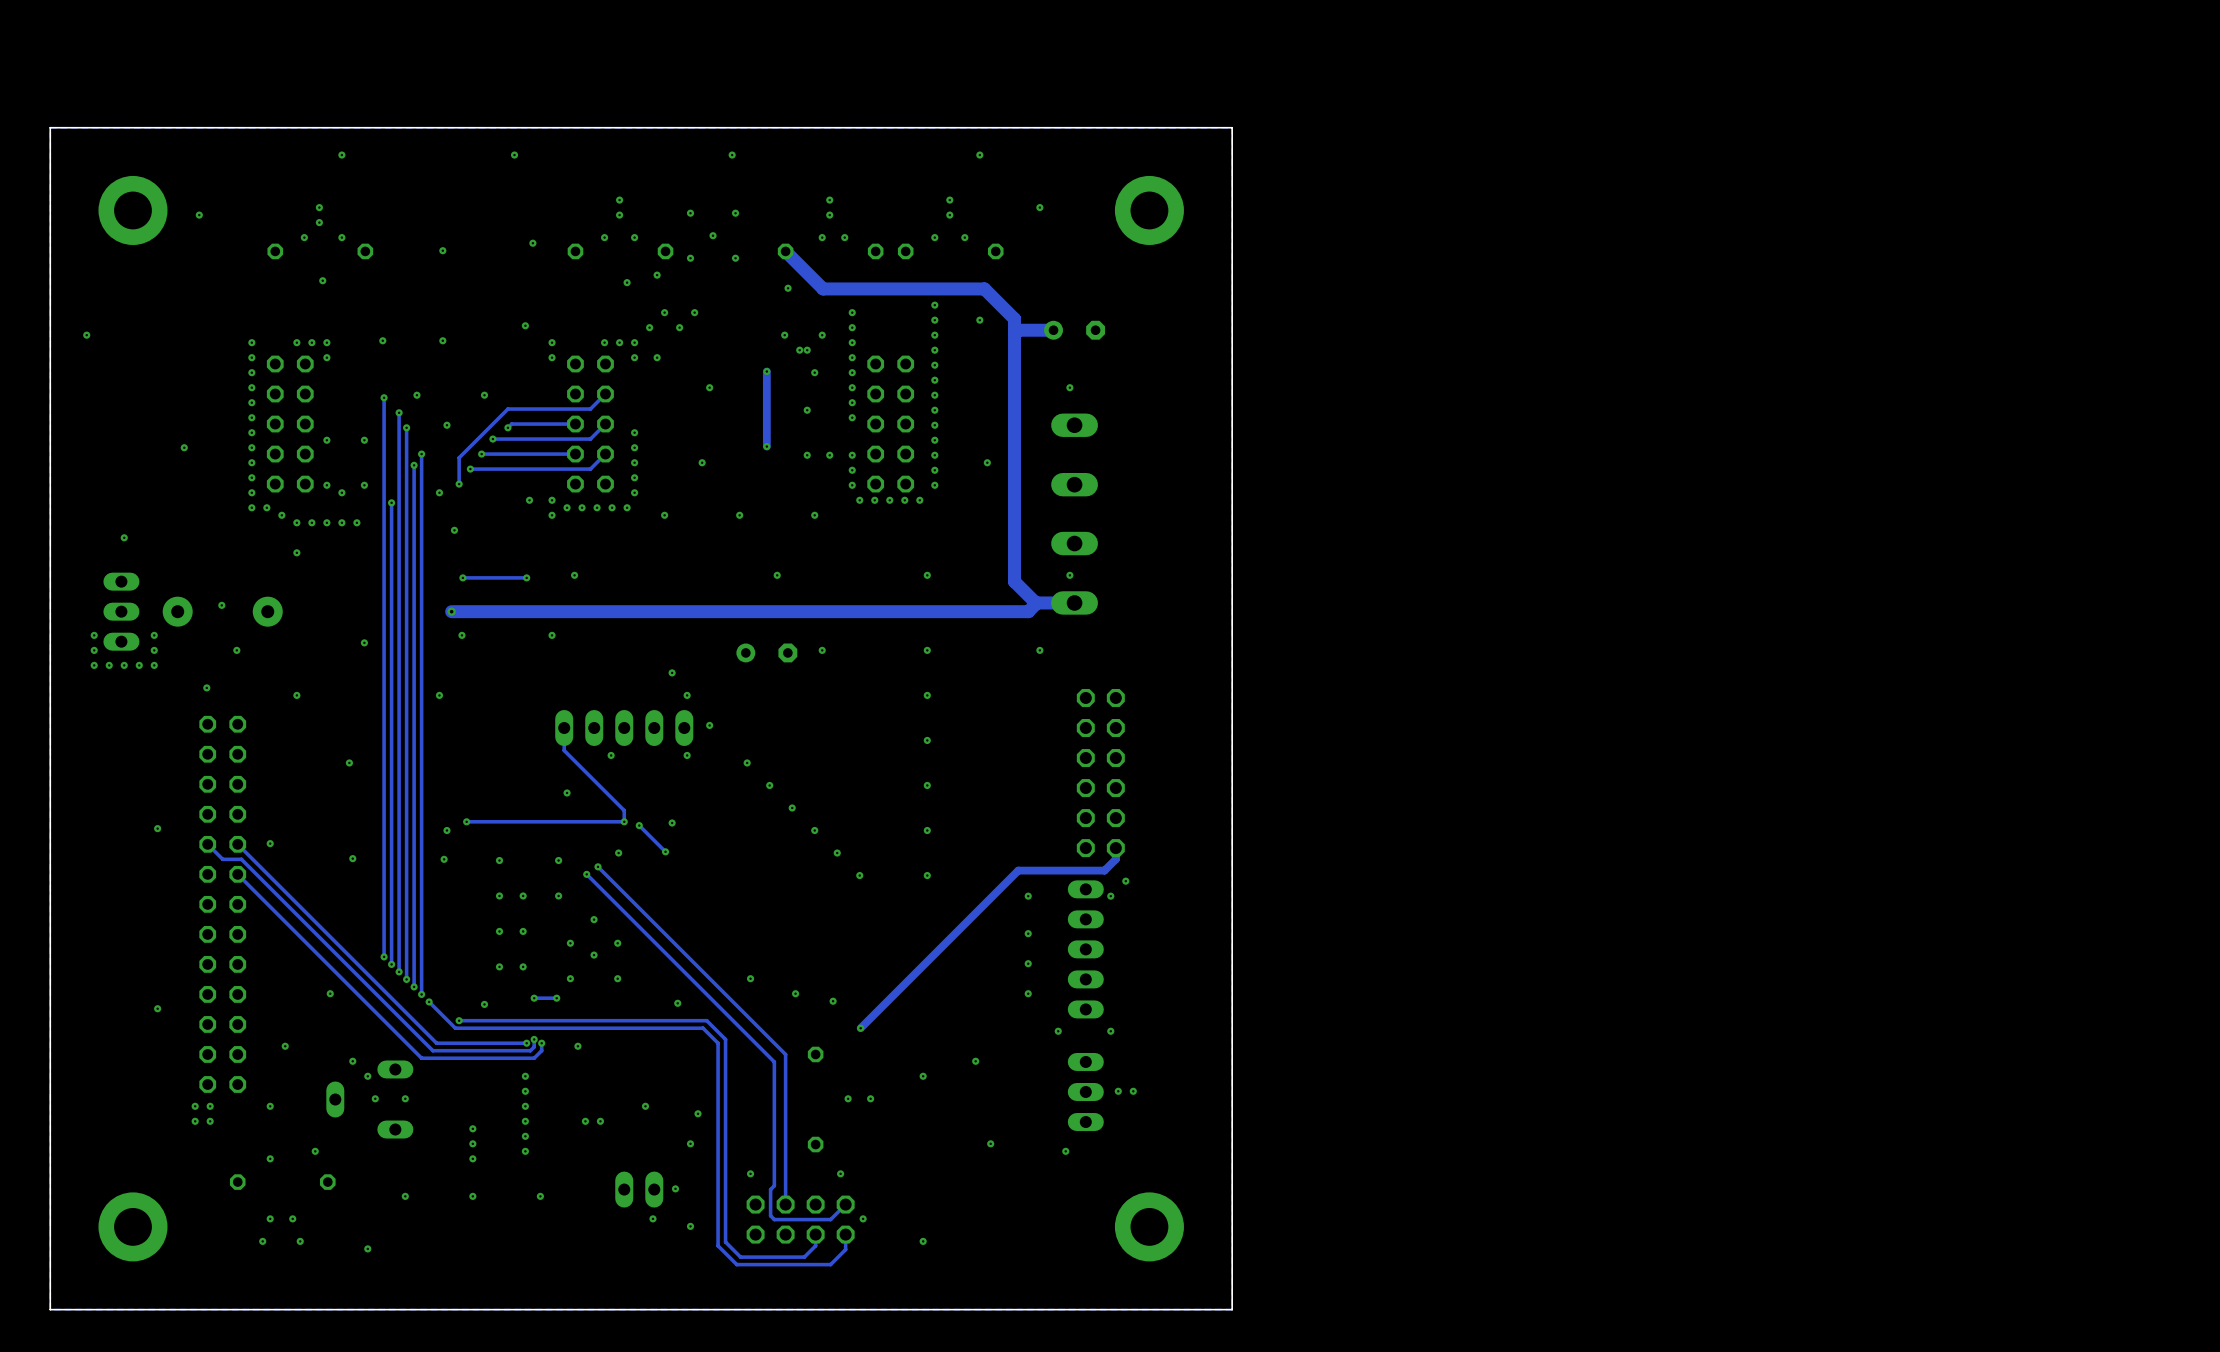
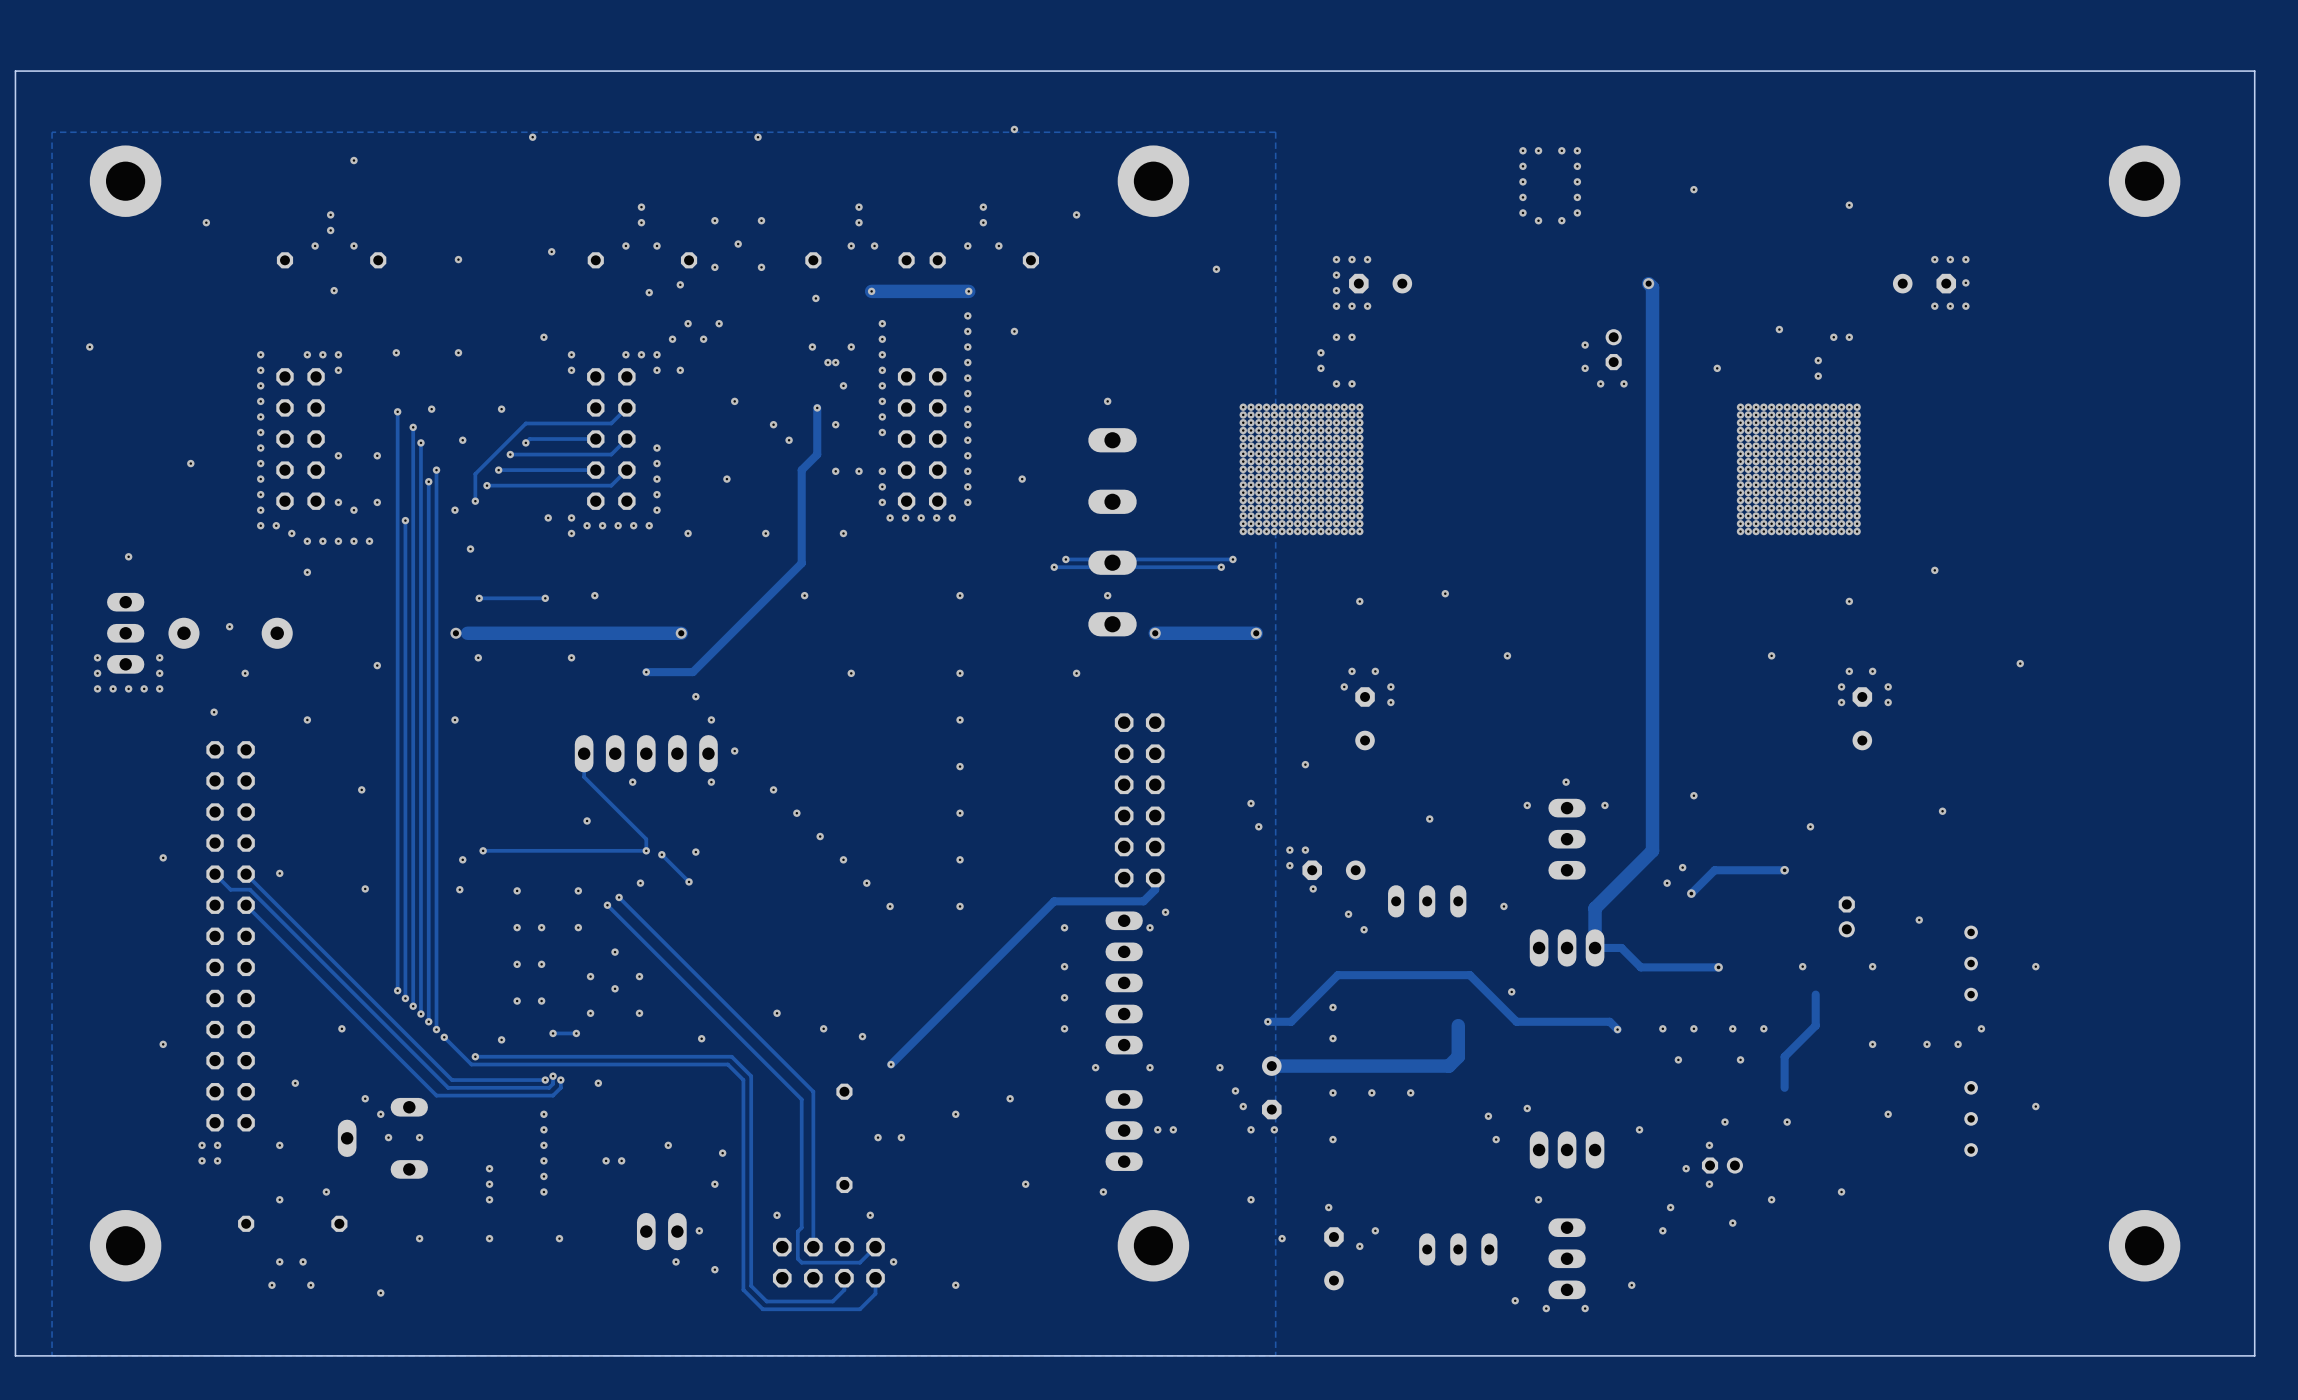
via: none -> (1522, 150)
via: none -> (1538, 150)
via: none -> (1561, 150)
via: none -> (1577, 150)
via position: (514, 155) -> (532, 137)
via position: (732, 155) -> (758, 137)
via position: (979, 155) -> (1014, 129)
via: none -> (1522, 166)
via: none -> (1577, 166)
via: none -> (1522, 181)
via: none -> (1577, 181)
part: none -> (2144, 181)
via: none -> (1693, 189)
via: none -> (1522, 197)
via: none -> (1577, 197)
via: none -> (1849, 205)
via: none -> (1522, 212)
via: none -> (1577, 212)
part position: (132, 210) -> (125, 181)
part position: (1149, 210) -> (1153, 181)
via: none -> (1538, 220)
via: none -> (1561, 220)
via: none -> (1336, 259)
via: none -> (1352, 259)
via: none -> (1367, 259)
via: none -> (1934, 259)
via: none -> (1950, 259)
via: none -> (1965, 259)
track: (785, 251) (823, 288) (984, 288) (1014, 318) (1014, 581) (1035, 602) (1074, 602) -> none
via: none -> (1216, 269)
via: none -> (1336, 275)
part: none -> (1380, 283)
track: none -> (1648, 283) (1652, 287) (1652, 850) (1595, 908) (1595, 947) (1621, 947) (1640, 967) (1718, 967)
via: none -> (1648, 283)
part: none -> (1924, 283)
via: none -> (1965, 282)
via: none -> (1336, 290)
via: none -> (871, 291)
track: none -> (968, 291) (871, 291)
via: none -> (968, 291)
via: none -> (1336, 306)
via: none -> (1352, 306)
via: none -> (1367, 306)
via: none -> (1934, 306)
via: none -> (1950, 306)
via: none -> (1965, 306)
via: none -> (1779, 329)
via: none -> (1336, 337)
via: none -> (1352, 337)
via: none -> (1833, 337)
via: none -> (1849, 337)
track: (1053, 330) (1018, 330) (1014, 333) -> none
part: (1074, 330) -> none
via: none -> (1585, 345)
part: none -> (1613, 349)
via: none -> (1320, 352)
via: none -> (1818, 360)
via: none -> (1320, 368)
via: none -> (1585, 368)
via: none -> (1717, 368)
via: none -> (1818, 376)
via: none -> (1336, 383)
via: none -> (1352, 383)
via: none -> (1600, 383)
via: none -> (1623, 383)
track: (766, 371) (766, 446) -> none
via: (766, 371) -> none
via: none -> (1243, 407)
via: none -> (1251, 407)
via: none -> (1258, 407)
via: none -> (1266, 407)
via: none -> (1274, 407)
via: none -> (1282, 407)
via: none -> (1289, 407)
via: none -> (1297, 407)
via: none -> (1305, 407)
via: none -> (1313, 407)
via: none -> (1320, 407)
via: none -> (1328, 407)
via: none -> (1336, 407)
via: none -> (1344, 407)
via: none -> (1352, 407)
via: none -> (1359, 407)
via: none -> (1740, 407)
via: none -> (1748, 407)
via: none -> (1756, 407)
via: none -> (1763, 407)
via: none -> (1771, 407)
via: none -> (1779, 407)
via: none -> (1787, 407)
via: none -> (1794, 407)
via: none -> (1802, 407)
via: none -> (1810, 407)
via: none -> (1818, 407)
via: none -> (1826, 407)
via: none -> (1833, 407)
via: none -> (1841, 407)
via: none -> (1849, 407)
via: none -> (1857, 407)
track: none -> (817, 407) (817, 454) (801, 470) (801, 563) (692, 672) (646, 672)
via: none -> (817, 407)
via: none -> (1243, 414)
via: none -> (1251, 414)
via: none -> (1258, 414)
via: none -> (1266, 414)
via: none -> (1274, 414)
via: none -> (1282, 414)
via: none -> (1289, 414)
via: none -> (1297, 414)
via: none -> (1305, 414)
via: none -> (1313, 414)
via: none -> (1320, 414)
via: none -> (1328, 414)
via: none -> (1336, 414)
via: none -> (1344, 414)
via: none -> (1352, 414)
via: none -> (1359, 414)
via: none -> (1740, 414)
via: none -> (1748, 414)
via: none -> (1756, 414)
via: none -> (1763, 414)
via: none -> (1771, 414)
via: none -> (1779, 414)
via: none -> (1787, 414)
via: none -> (1794, 414)
via: none -> (1802, 414)
via: none -> (1810, 414)
via: none -> (1818, 414)
via: none -> (1826, 414)
via: none -> (1833, 414)
via: none -> (1841, 414)
via: none -> (1849, 414)
via: none -> (1857, 414)
via: none -> (1243, 422)
via: none -> (1251, 422)
via: none -> (1258, 422)
via: none -> (1266, 422)
via: none -> (1274, 422)
via: none -> (1282, 422)
via: none -> (1289, 422)
via: none -> (1297, 422)
via: none -> (1305, 422)
via: none -> (1313, 422)
via: none -> (1320, 422)
via: none -> (1328, 422)
via: none -> (1336, 422)
via: none -> (1344, 422)
via: none -> (1352, 422)
via: none -> (1359, 422)
via: none -> (1740, 422)
via: none -> (1748, 422)
via: none -> (1756, 422)
via: none -> (1763, 422)
via: none -> (1771, 422)
via: none -> (1779, 422)
via: none -> (1787, 422)
via: none -> (1794, 422)
via: none -> (1802, 422)
via: none -> (1810, 422)
via: none -> (1818, 422)
via: none -> (1826, 422)
via: none -> (1833, 422)
via: none -> (1841, 422)
via: none -> (1849, 422)
via: none -> (1857, 422)
via: none -> (773, 424)
via: none -> (1243, 430)
via: none -> (1251, 430)
via: none -> (1258, 430)
via: none -> (1266, 430)
via: none -> (1274, 430)
via: none -> (1282, 430)
via: none -> (1289, 430)
via: none -> (1297, 430)
via: none -> (1305, 430)
via: none -> (1313, 430)
via: none -> (1320, 430)
via: none -> (1328, 430)
via: none -> (1336, 430)
via: none -> (1344, 430)
via: none -> (1352, 430)
via: none -> (1359, 430)
via: none -> (1740, 430)
via: none -> (1748, 430)
via: none -> (1756, 430)
via: none -> (1763, 430)
via: none -> (1771, 430)
via: none -> (1779, 430)
via: none -> (1787, 430)
via: none -> (1794, 430)
via: none -> (1802, 430)
via: none -> (1810, 430)
via: none -> (1818, 430)
via: none -> (1826, 430)
via: none -> (1833, 430)
via: none -> (1841, 430)
via: none -> (1849, 430)
via: none -> (1857, 430)
via: none -> (1243, 438)
via: none -> (1251, 438)
via: none -> (1258, 438)
via: none -> (1266, 438)
via: none -> (1274, 438)
via: none -> (1282, 438)
via: none -> (1289, 438)
via: none -> (1297, 438)
via: none -> (1305, 438)
via: none -> (1313, 438)
via: none -> (1320, 438)
via: none -> (1328, 438)
via: none -> (1336, 438)
via: none -> (1344, 438)
via: none -> (1352, 438)
via: none -> (1359, 438)
via: none -> (1740, 438)
via: none -> (1748, 438)
via: none -> (1756, 438)
via: none -> (1763, 438)
via: none -> (1771, 438)
via: none -> (1779, 438)
via: none -> (1787, 438)
via: none -> (1794, 438)
via: none -> (1802, 438)
via: none -> (1810, 438)
via: none -> (1818, 438)
via: none -> (1826, 438)
via: none -> (1833, 438)
via: none -> (1841, 438)
via: none -> (1849, 438)
via: none -> (1857, 438)
via: none -> (789, 440)
via: none -> (1243, 446)
via: none -> (1251, 446)
via: none -> (1258, 446)
via: none -> (1266, 446)
via: none -> (1274, 446)
via: none -> (1282, 446)
via: none -> (1289, 446)
via: none -> (1297, 446)
via: none -> (1305, 446)
via: none -> (1313, 446)
via: none -> (1320, 446)
via: none -> (1328, 446)
via: none -> (1336, 446)
via: none -> (1344, 446)
via: none -> (1352, 446)
via: none -> (1359, 446)
via: none -> (1740, 446)
via: none -> (1748, 446)
via: none -> (1756, 446)
via: none -> (1763, 446)
via: none -> (1771, 446)
via: none -> (1779, 446)
via: none -> (1787, 446)
via: none -> (1794, 446)
via: none -> (1802, 446)
via: none -> (1810, 446)
via: none -> (1818, 446)
via: none -> (1826, 446)
via: none -> (1833, 446)
via: none -> (1841, 446)
via: none -> (1849, 446)
via: none -> (1857, 446)
via: none -> (1243, 453)
via: none -> (1251, 453)
via: none -> (1258, 453)
via: none -> (1266, 453)
via: none -> (1274, 453)
via: none -> (1282, 453)
via: none -> (1289, 453)
via: none -> (1297, 453)
via: none -> (1305, 453)
via: none -> (1313, 453)
via: none -> (1320, 453)
via: none -> (1328, 453)
via: none -> (1336, 453)
via: none -> (1344, 453)
via: none -> (1352, 453)
via: none -> (1359, 453)
via: none -> (1740, 453)
via: none -> (1748, 453)
via: none -> (1756, 453)
via: none -> (1763, 453)
via: none -> (1771, 453)
via: none -> (1779, 453)
via: none -> (1787, 453)
via: none -> (1794, 453)
via: none -> (1802, 453)
via: none -> (1810, 453)
via: none -> (1818, 453)
via: none -> (1826, 453)
via: none -> (1833, 453)
via: none -> (1841, 453)
via: none -> (1849, 453)
via: none -> (1857, 453)
via: none -> (1243, 461)
via: none -> (1251, 461)
via: none -> (1258, 461)
via: none -> (1266, 461)
via: none -> (1274, 461)
via: none -> (1282, 461)
via: none -> (1289, 461)
via: none -> (1297, 461)
via: none -> (1305, 461)
via: none -> (1313, 461)
via: none -> (1320, 461)
via: none -> (1328, 461)
via: none -> (1336, 461)
via: none -> (1344, 461)
via: none -> (1352, 461)
via: none -> (1359, 461)
via: none -> (1740, 461)
via: none -> (1748, 461)
via: none -> (1756, 461)
via: none -> (1763, 461)
via: none -> (1771, 461)
via: none -> (1779, 461)
via: none -> (1787, 461)
via: none -> (1794, 461)
via: none -> (1802, 461)
via: none -> (1810, 461)
via: none -> (1818, 461)
via: none -> (1826, 461)
via: none -> (1833, 461)
via: none -> (1841, 461)
via: none -> (1849, 461)
via: none -> (1857, 461)
via: (766, 446) -> none
via: none -> (1243, 469)
via: none -> (1251, 469)
via: none -> (1258, 469)
via: none -> (1266, 469)
via: none -> (1274, 469)
via: none -> (1282, 469)
via: none -> (1289, 469)
via: none -> (1297, 469)
via: none -> (1305, 469)
via: none -> (1313, 469)
via: none -> (1320, 469)
via: none -> (1328, 469)
via: none -> (1336, 469)
via: none -> (1344, 469)
via: none -> (1352, 469)
via: none -> (1359, 469)
via: none -> (1740, 469)
via: none -> (1748, 469)
via: none -> (1756, 469)
via: none -> (1763, 469)
via: none -> (1771, 469)
via: none -> (1779, 469)
via: none -> (1787, 469)
via: none -> (1794, 469)
via: none -> (1802, 469)
via: none -> (1810, 469)
via: none -> (1818, 469)
via: none -> (1826, 469)
via: none -> (1833, 469)
via: none -> (1841, 469)
via: none -> (1849, 469)
via: none -> (1857, 469)
via: none -> (1243, 477)
via: none -> (1251, 477)
via: none -> (1258, 477)
via: none -> (1266, 477)
via: none -> (1274, 477)
via: none -> (1282, 477)
via: none -> (1289, 477)
via: none -> (1297, 477)
via: none -> (1305, 477)
via: none -> (1313, 477)
via: none -> (1320, 477)
via: none -> (1328, 477)
via: none -> (1336, 477)
via: none -> (1344, 477)
via: none -> (1352, 477)
via: none -> (1359, 477)
via: none -> (1740, 477)
via: none -> (1748, 477)
via: none -> (1756, 477)
via: none -> (1763, 477)
via: none -> (1771, 477)
via: none -> (1779, 477)
via: none -> (1787, 477)
via: none -> (1794, 477)
via: none -> (1802, 477)
via: none -> (1810, 477)
via: none -> (1818, 477)
via: none -> (1826, 477)
via: none -> (1833, 477)
via: none -> (1841, 477)
via: none -> (1849, 477)
via: none -> (1857, 477)
via: none -> (1243, 484)
via: none -> (1251, 484)
via: none -> (1258, 484)
via: none -> (1266, 484)
via: none -> (1274, 484)
via: none -> (1282, 484)
via: none -> (1289, 484)
via: none -> (1297, 484)
via: none -> (1305, 484)
via: none -> (1313, 484)
via: none -> (1320, 484)
via: none -> (1328, 484)
via: none -> (1336, 484)
via: none -> (1344, 484)
via: none -> (1352, 484)
via: none -> (1359, 484)
via: none -> (1740, 484)
via: none -> (1748, 484)
via: none -> (1756, 484)
via: none -> (1763, 484)
via: none -> (1771, 484)
via: none -> (1779, 484)
via: none -> (1787, 484)
via: none -> (1794, 484)
via: none -> (1802, 484)
via: none -> (1810, 484)
via: none -> (1818, 484)
via: none -> (1826, 484)
via: none -> (1833, 484)
via: none -> (1841, 484)
via: none -> (1849, 484)
via: none -> (1857, 484)
via: none -> (1243, 492)
via: none -> (1251, 492)
via: none -> (1258, 492)
via: none -> (1266, 492)
via: none -> (1274, 492)
via: none -> (1282, 492)
via: none -> (1289, 492)
via: none -> (1297, 492)
via: none -> (1305, 492)
via: none -> (1313, 492)
via: none -> (1320, 492)
via: none -> (1328, 492)
via: none -> (1336, 492)
via: none -> (1344, 492)
via: none -> (1352, 492)
via: none -> (1359, 492)
via: none -> (1740, 492)
via: none -> (1748, 492)
via: none -> (1756, 492)
via: none -> (1763, 492)
via: none -> (1771, 492)
via: none -> (1779, 492)
via: none -> (1787, 492)
via: none -> (1794, 492)
via: none -> (1802, 492)
via: none -> (1810, 492)
via: none -> (1818, 492)
via: none -> (1826, 492)
via: none -> (1833, 492)
via: none -> (1841, 492)
via: none -> (1849, 492)
via: none -> (1857, 492)
via: none -> (1243, 500)
via: none -> (1251, 500)
via: none -> (1258, 500)
via: none -> (1266, 500)
via: none -> (1274, 500)
via: none -> (1282, 500)
via: none -> (1289, 500)
via: none -> (1297, 500)
via: none -> (1305, 500)
via: none -> (1313, 500)
via: none -> (1320, 500)
via: none -> (1328, 500)
via: none -> (1336, 500)
via: none -> (1344, 500)
via: none -> (1352, 500)
via: none -> (1359, 500)
via: none -> (1740, 500)
via: none -> (1748, 500)
via: none -> (1756, 500)
via: none -> (1763, 500)
via: none -> (1771, 500)
via: none -> (1779, 500)
via: none -> (1787, 500)
via: none -> (1794, 500)
via: none -> (1802, 500)
via: none -> (1810, 500)
via: none -> (1818, 500)
via: none -> (1826, 500)
via: none -> (1833, 500)
via: none -> (1841, 500)
via: none -> (1849, 500)
via: none -> (1857, 500)
via: none -> (1243, 508)
via: none -> (1251, 508)
via: none -> (1258, 508)
via: none -> (1266, 508)
via: none -> (1274, 508)
via: none -> (1282, 508)
via: none -> (1289, 508)
via: none -> (1297, 508)
via: none -> (1305, 508)
via: none -> (1313, 508)
via: none -> (1320, 508)
via: none -> (1328, 508)
via: none -> (1336, 508)
via: none -> (1344, 508)
via: none -> (1352, 508)
via: none -> (1359, 508)
via: none -> (1740, 508)
via: none -> (1748, 508)
via: none -> (1756, 508)
via: none -> (1763, 508)
via: none -> (1771, 508)
via: none -> (1779, 508)
via: none -> (1787, 508)
via: none -> (1794, 508)
via: none -> (1802, 508)
via: none -> (1810, 508)
via: none -> (1818, 508)
via: none -> (1826, 508)
via: none -> (1833, 508)
via: none -> (1841, 508)
via: none -> (1849, 508)
via: none -> (1857, 508)
via: none -> (1243, 515)
via: none -> (1251, 515)
via: none -> (1258, 515)
via: none -> (1266, 515)
via: none -> (1274, 515)
via: none -> (1282, 515)
via: none -> (1289, 515)
via: none -> (1297, 515)
via: none -> (1305, 515)
via: none -> (1313, 515)
via: none -> (1320, 515)
via: none -> (1328, 515)
via: none -> (1336, 515)
via: none -> (1344, 515)
via: none -> (1352, 515)
via: none -> (1359, 515)
via: none -> (1740, 515)
via: none -> (1748, 515)
via: none -> (1756, 515)
via: none -> (1763, 515)
via: none -> (1771, 515)
via: none -> (1779, 515)
via: none -> (1787, 515)
via: none -> (1794, 515)
via: none -> (1802, 515)
via: none -> (1810, 515)
via: none -> (1818, 515)
via: none -> (1826, 515)
via: none -> (1833, 515)
via: none -> (1841, 515)
via: none -> (1849, 515)
via: none -> (1857, 515)
via: none -> (1243, 523)
via: none -> (1251, 523)
via: none -> (1258, 523)
via: none -> (1266, 523)
via: none -> (1274, 523)
via: none -> (1282, 523)
via: none -> (1289, 523)
via: none -> (1297, 523)
via: none -> (1305, 523)
via: none -> (1313, 523)
via: none -> (1320, 523)
via: none -> (1328, 523)
via: none -> (1336, 523)
via: none -> (1344, 523)
via: none -> (1352, 523)
via: none -> (1359, 523)
via: none -> (1740, 523)
via: none -> (1748, 523)
via: none -> (1756, 523)
via: none -> (1763, 523)
via: none -> (1771, 523)
via: none -> (1779, 523)
via: none -> (1787, 523)
via: none -> (1794, 523)
via: none -> (1802, 523)
via: none -> (1810, 523)
via: none -> (1818, 523)
via: none -> (1826, 523)
via: none -> (1833, 523)
via: none -> (1841, 523)
via: none -> (1849, 523)
via: none -> (1857, 523)
via: none -> (1243, 531)
via: none -> (1251, 531)
via: none -> (1258, 531)
via: none -> (1266, 531)
via: none -> (1274, 531)
via: none -> (1282, 531)
via: none -> (1289, 531)
via: none -> (1297, 531)
via: none -> (1305, 531)
via: none -> (1313, 531)
via: none -> (1320, 531)
via: none -> (1328, 531)
via: none -> (1336, 531)
via: none -> (1344, 531)
via: none -> (1352, 531)
via: none -> (1359, 531)
via: none -> (1740, 531)
via: none -> (1748, 531)
via: none -> (1756, 531)
via: none -> (1763, 531)
via: none -> (1771, 531)
via: none -> (1779, 531)
via: none -> (1787, 531)
via: none -> (1794, 531)
via: none -> (1802, 531)
via: none -> (1810, 531)
via: none -> (1818, 531)
via: none -> (1826, 531)
via: none -> (1833, 531)
via: none -> (1841, 531)
via: none -> (1849, 531)
via: none -> (1857, 531)
via: none -> (1065, 559)
track: none -> (1232, 559) (1065, 559)
via: none -> (1232, 559)
via: none -> (1054, 567)
track: none -> (1221, 567) (1054, 567)
via: none -> (1221, 567)
via: none -> (1934, 570)
via: none -> (1445, 593)
via: none -> (1359, 601)
via: none -> (1849, 601)
track: (1037, 602) (1028, 611) (658, 611) -> none
via: none -> (455, 633)
via: (451, 611) -> none
via: none -> (681, 633)
via: none -> (1155, 633)
track: none -> (1256, 633) (1155, 633)
via: none -> (1256, 633)
via: none -> (1507, 655)
via: none -> (1771, 655)
via: none -> (2020, 663)
via: none -> (1352, 671)
via: none -> (1375, 671)
via: none -> (1849, 671)
via: none -> (1872, 671)
via: none -> (646, 672)
part: (766, 652) -> none
via: none -> (1344, 686)
via: none -> (1390, 686)
via: none -> (1841, 686)
via: none -> (1888, 686)
via: none -> (1390, 702)
via: none -> (1841, 702)
via: none -> (1888, 702)
part: none -> (1365, 718)
part: none -> (1862, 718)
via: none -> (1305, 764)
via: none -> (1566, 782)
via: none -> (1693, 795)
via: none -> (1251, 803)
via: none -> (1527, 805)
via: none -> (1604, 805)
via: none -> (1942, 811)
via: none -> (1429, 819)
via: none -> (1258, 826)
via: none -> (1810, 826)
part: none -> (1567, 839)
via: none -> (1289, 850)
via: none -> (1305, 850)
via: none -> (1289, 865)
via: none -> (1682, 867)
part: none -> (1333, 870)
track: none -> (1784, 870) (1714, 870) (1691, 893)
via: none -> (1784, 870)
via: none -> (1667, 883)
via: none -> (1313, 888)
via: none -> (1691, 893)
part: none -> (1427, 901)
via: none -> (1503, 906)
via: none -> (1348, 914)
part: none -> (1846, 916)
via: none -> (1919, 920)
via: none -> (1364, 929)
part: none -> (1567, 947)
part: none -> (1971, 963)
via: none -> (1802, 966)
via: none -> (1872, 966)
via: none -> (2035, 966)
via: none -> (1718, 967)
via: none -> (1511, 991)
track: none -> (1815, 994) (1815, 1025) (1784, 1056) (1784, 1087)
via: none -> (1333, 1007)
track: none -> (1267, 1021) (1291, 1021) (1337, 975) (1469, 975) (1516, 1021) (1609, 1021) (1617, 1029)
via: none -> (1267, 1021)
track: none -> (1458, 1025) (1458, 1056) (1448, 1066) (1271, 1066)
via: none -> (1662, 1028)
via: none -> (1693, 1028)
via: none -> (1732, 1028)
via: none -> (1763, 1028)
via: none -> (1981, 1028)
via: none -> (1617, 1029)
via: none -> (1333, 1038)
via: none -> (1872, 1044)
via: none -> (1927, 1044)
via: none -> (1958, 1044)
via: none -> (1678, 1059)
via: none -> (1740, 1059)
via: none -> (1219, 1067)
part: none -> (1271, 1087)
via: none -> (1235, 1090)
via: none -> (1333, 1092)
via: none -> (1371, 1092)
via: none -> (1410, 1092)
via: none -> (1243, 1106)
via: none -> (2035, 1106)
via: none -> (1527, 1108)
via: none -> (1888, 1114)
via: none -> (1488, 1116)
part: none -> (1971, 1118)
via: none -> (1725, 1122)
via: none -> (1787, 1122)
via: none -> (1251, 1129)
via: none -> (1274, 1129)
via: none -> (1639, 1129)
via: none -> (1333, 1139)
via: none -> (1496, 1139)
via: none -> (1709, 1145)
part: none -> (1567, 1149)
part: none -> (1722, 1165)
via: none -> (1686, 1168)
via: none -> (1709, 1184)
via: none -> (1841, 1191)
via: none -> (1251, 1199)
via: none -> (1538, 1199)
via: none -> (1771, 1199)
via: none -> (1328, 1207)
via: none -> (1670, 1207)
via: none -> (1732, 1223)
via: none -> (1375, 1230)
via: none -> (1662, 1230)
via: none -> (1282, 1238)
via: none -> (1359, 1246)
part: none -> (2144, 1245)
part: none -> (1458, 1249)
part: none -> (1333, 1258)
part: none -> (1567, 1258)
part position: (132, 1226) -> (125, 1245)
part position: (1149, 1226) -> (1153, 1245)
via: none -> (1631, 1285)
via: none -> (1515, 1300)
via: none -> (1546, 1308)
via: none -> (1585, 1308)
board edge: (1232, 1309) (1232, 127) (50, 127) (50, 1309) -> (1275, 1355) (2254, 1355) (2254, 71) (15, 71) (15, 1355) (52, 1355)

